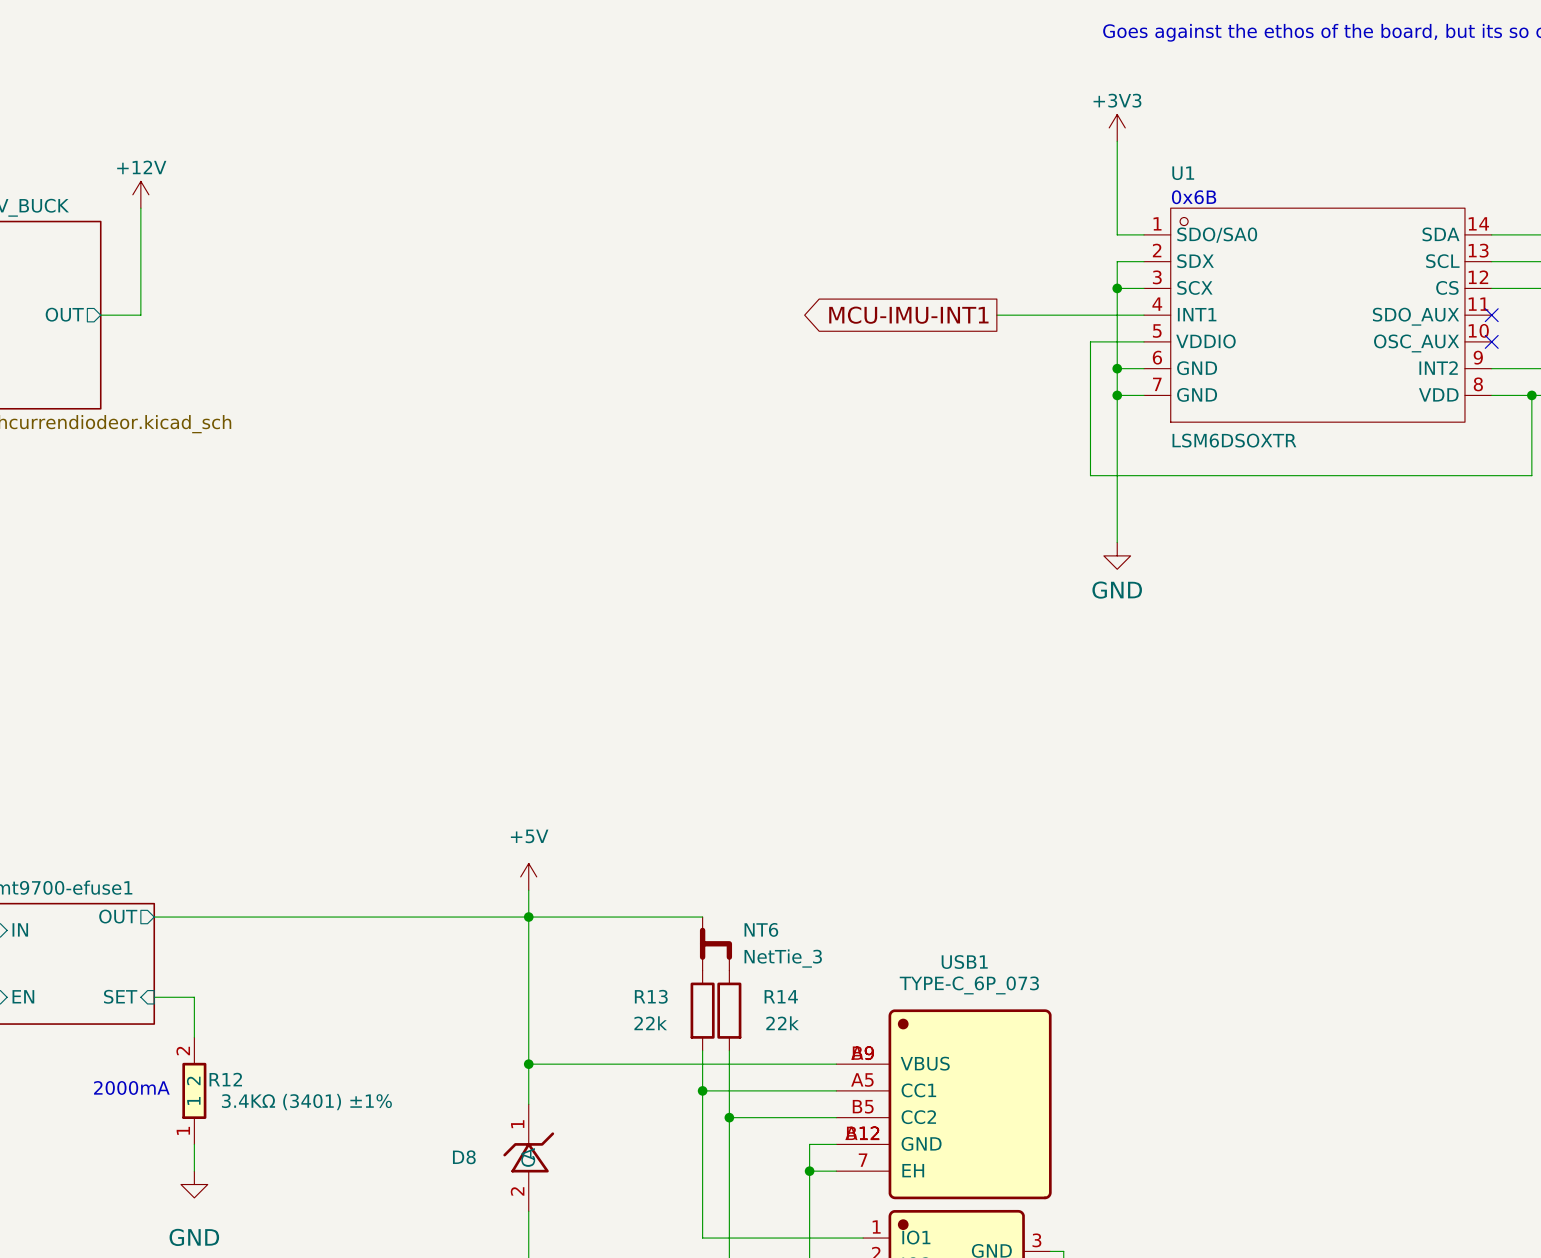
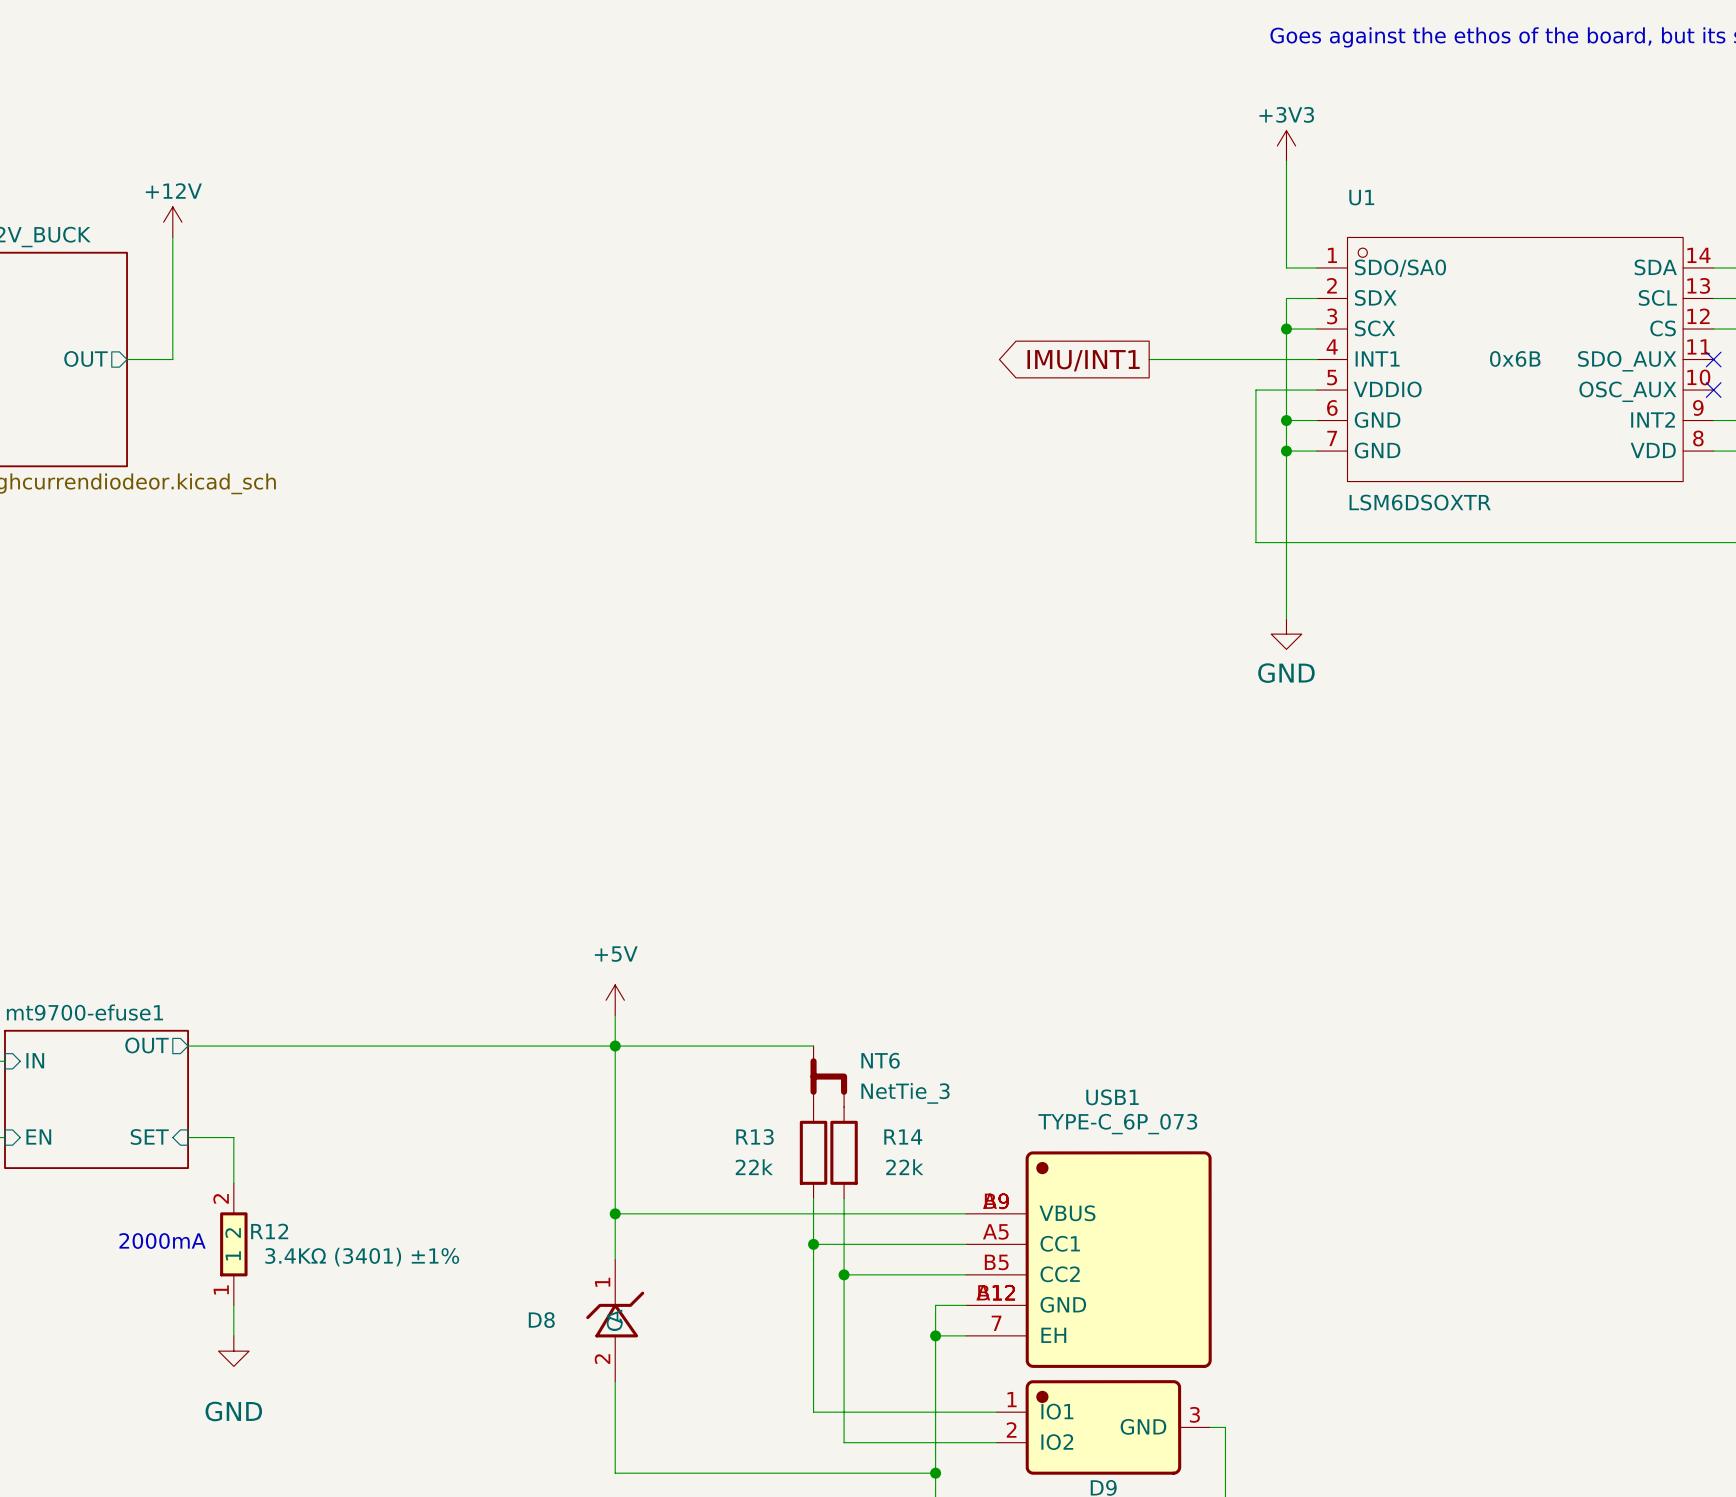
text: 0x6B (1194, 197) -> none
U1 text: none -> 0x6B (1515, 358)
global label: MCU-IMU-INT1 (908, 315) -> IMU/INT1 (1083, 360)

